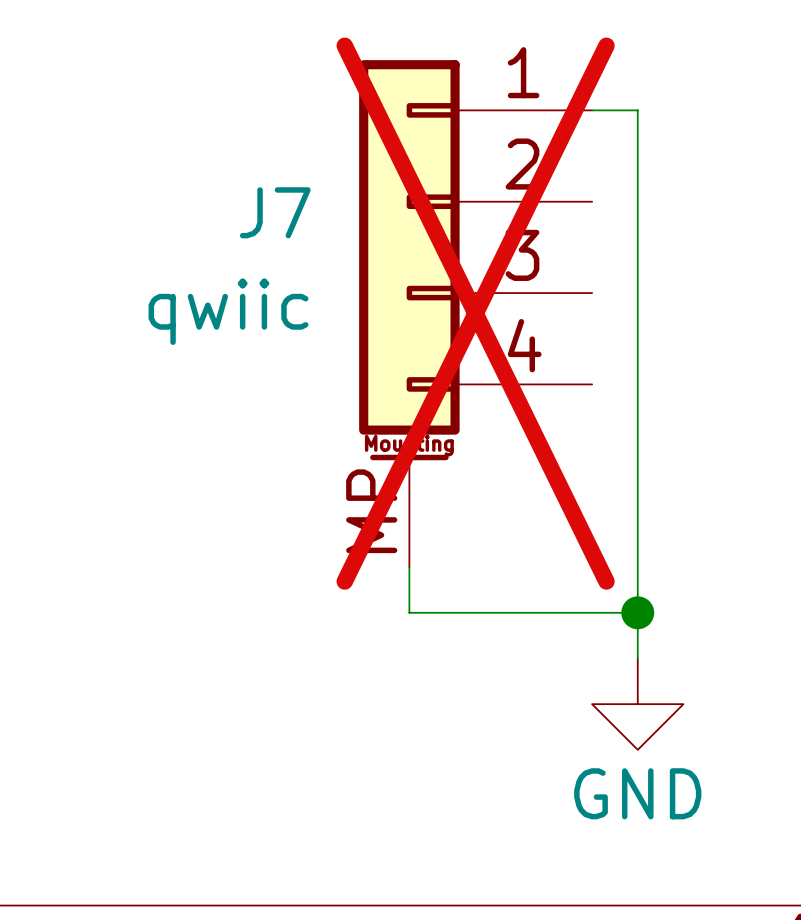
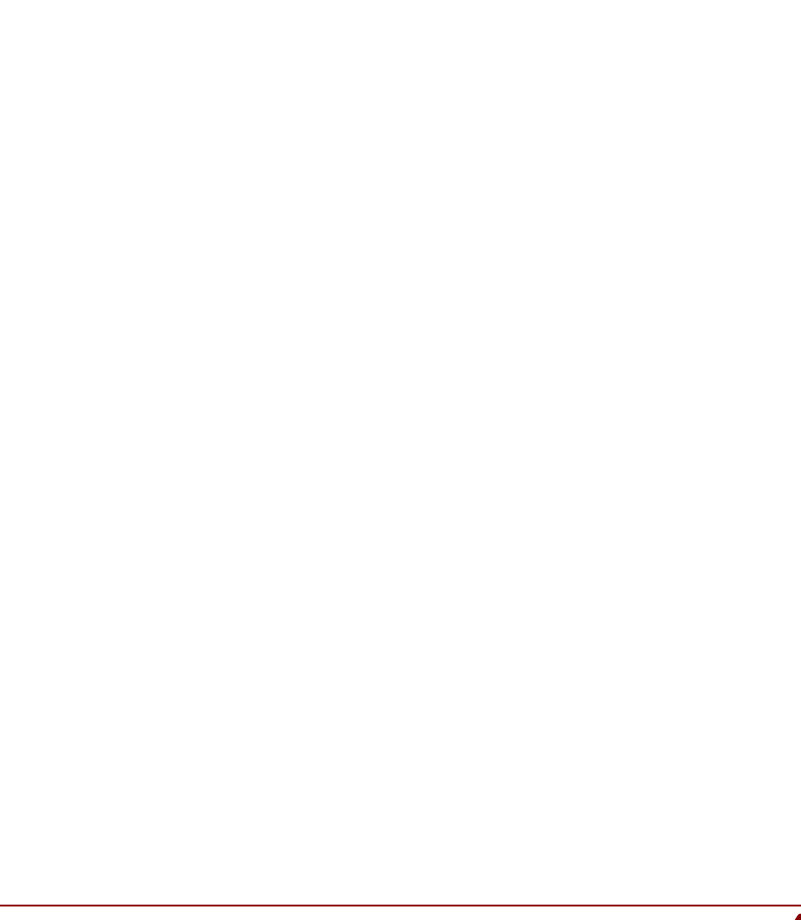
wire: (592, 110) (637, 110) (637, 658) -> none
J7: qwiic (475, 313) -> none
wire: (409, 567) (409, 612) (637, 612) -> none
junction: (637, 612) -> none
power symbol: GND (637, 704) -> none

